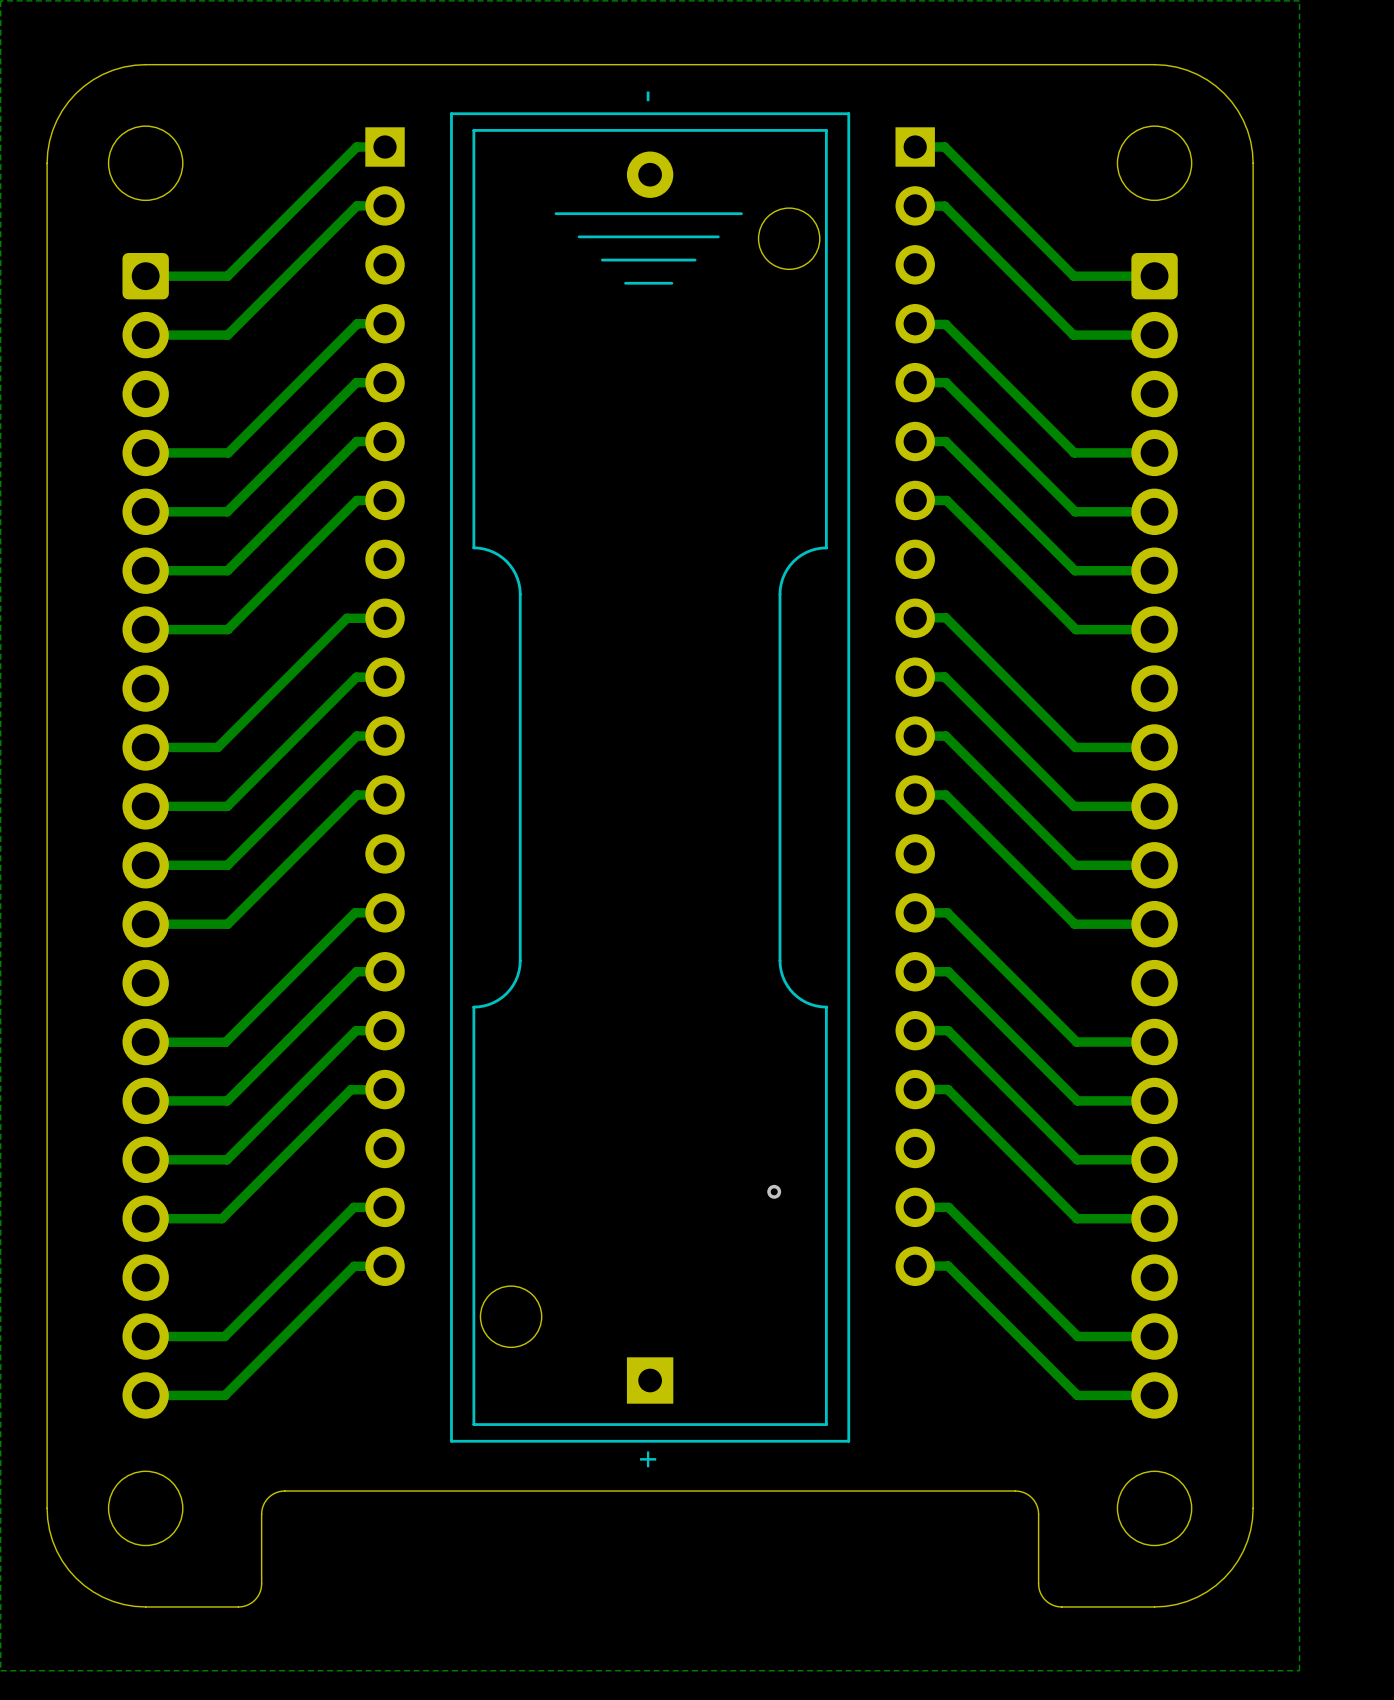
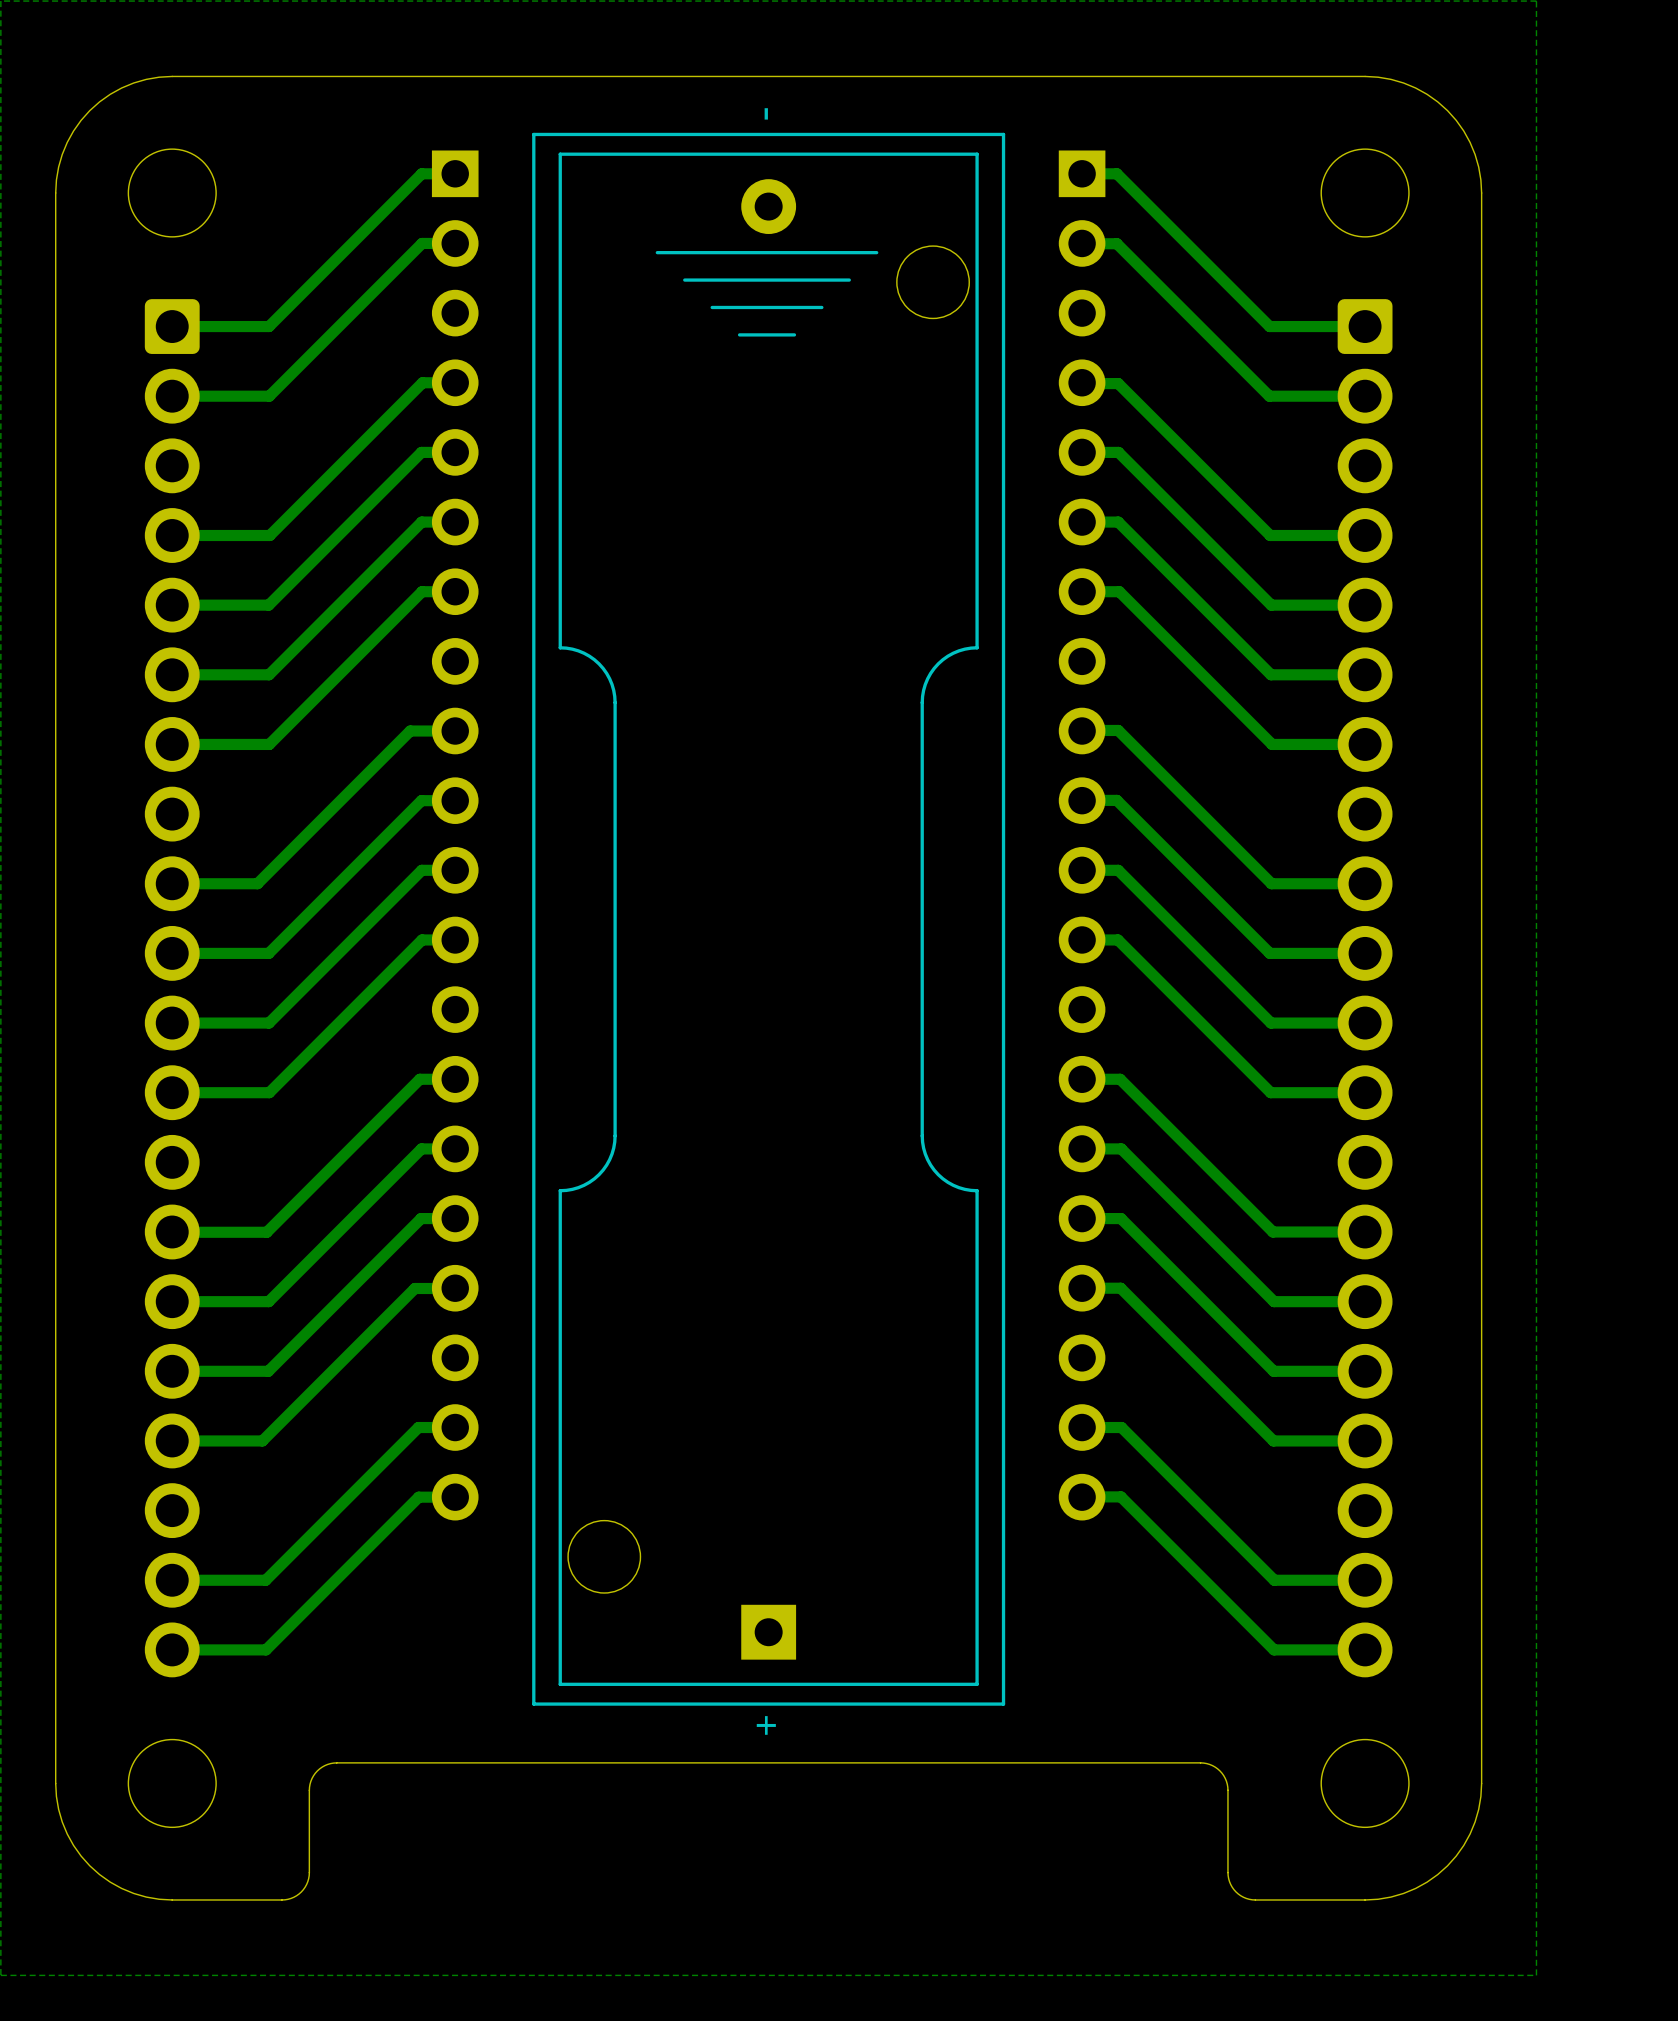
via: (774, 1191) -> none

